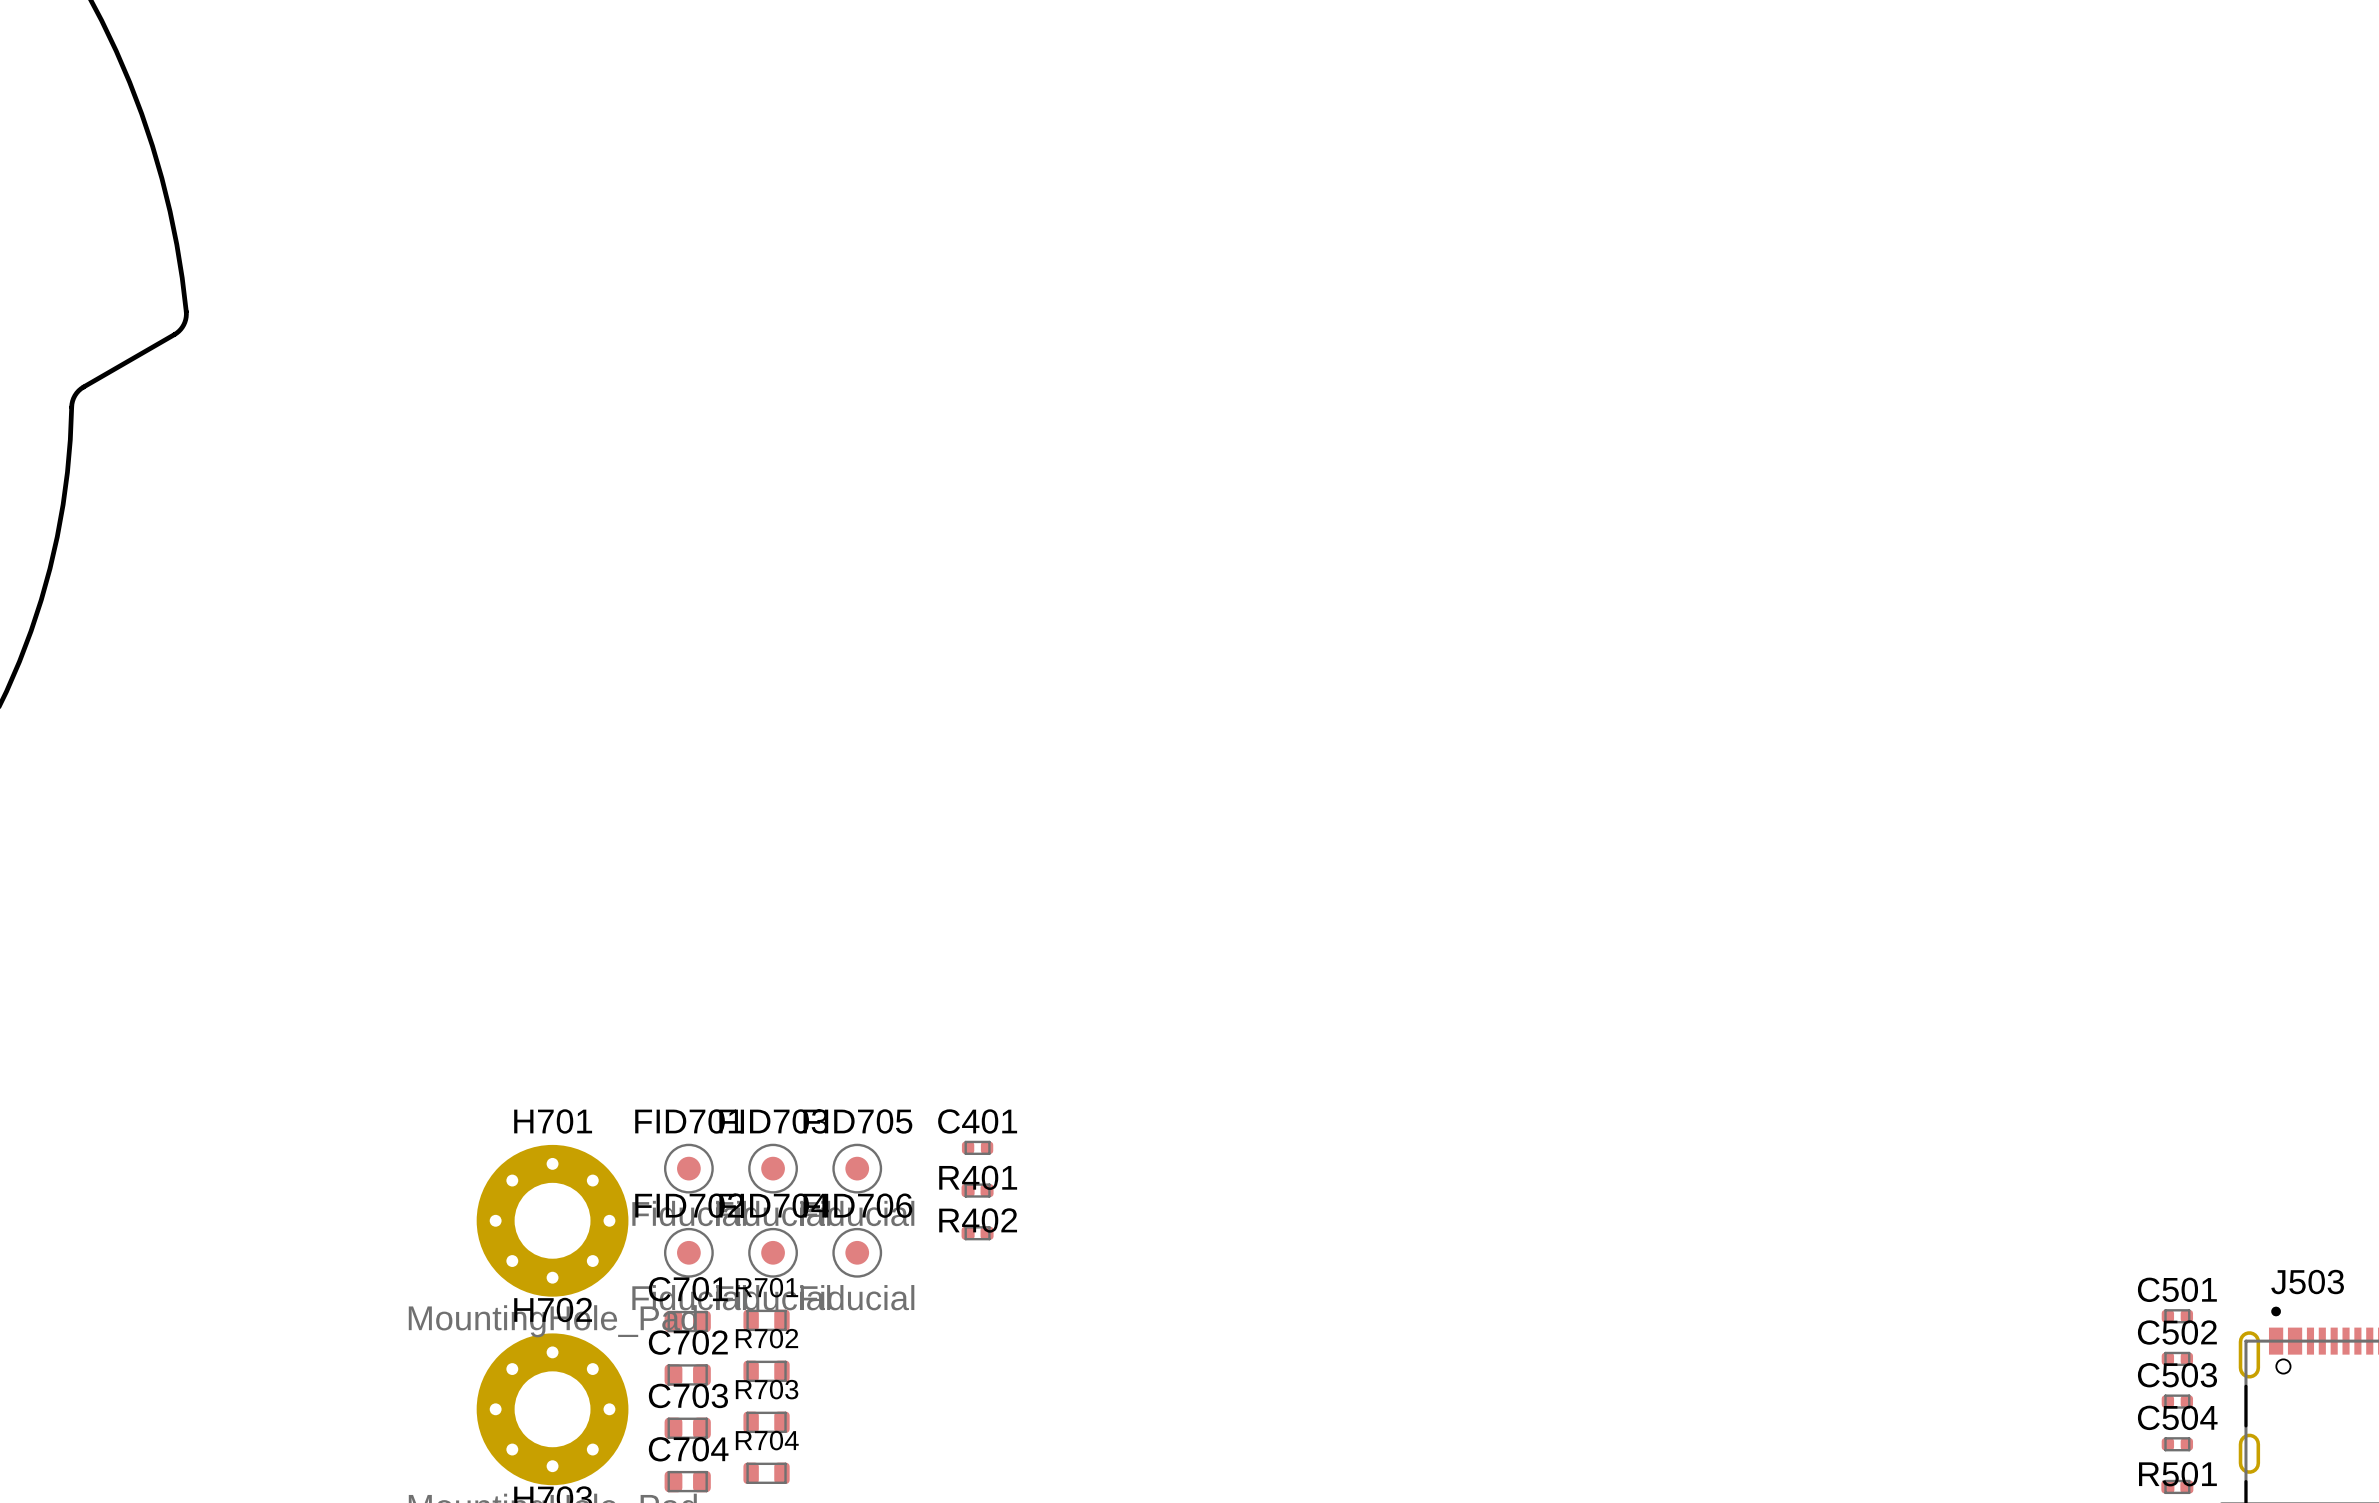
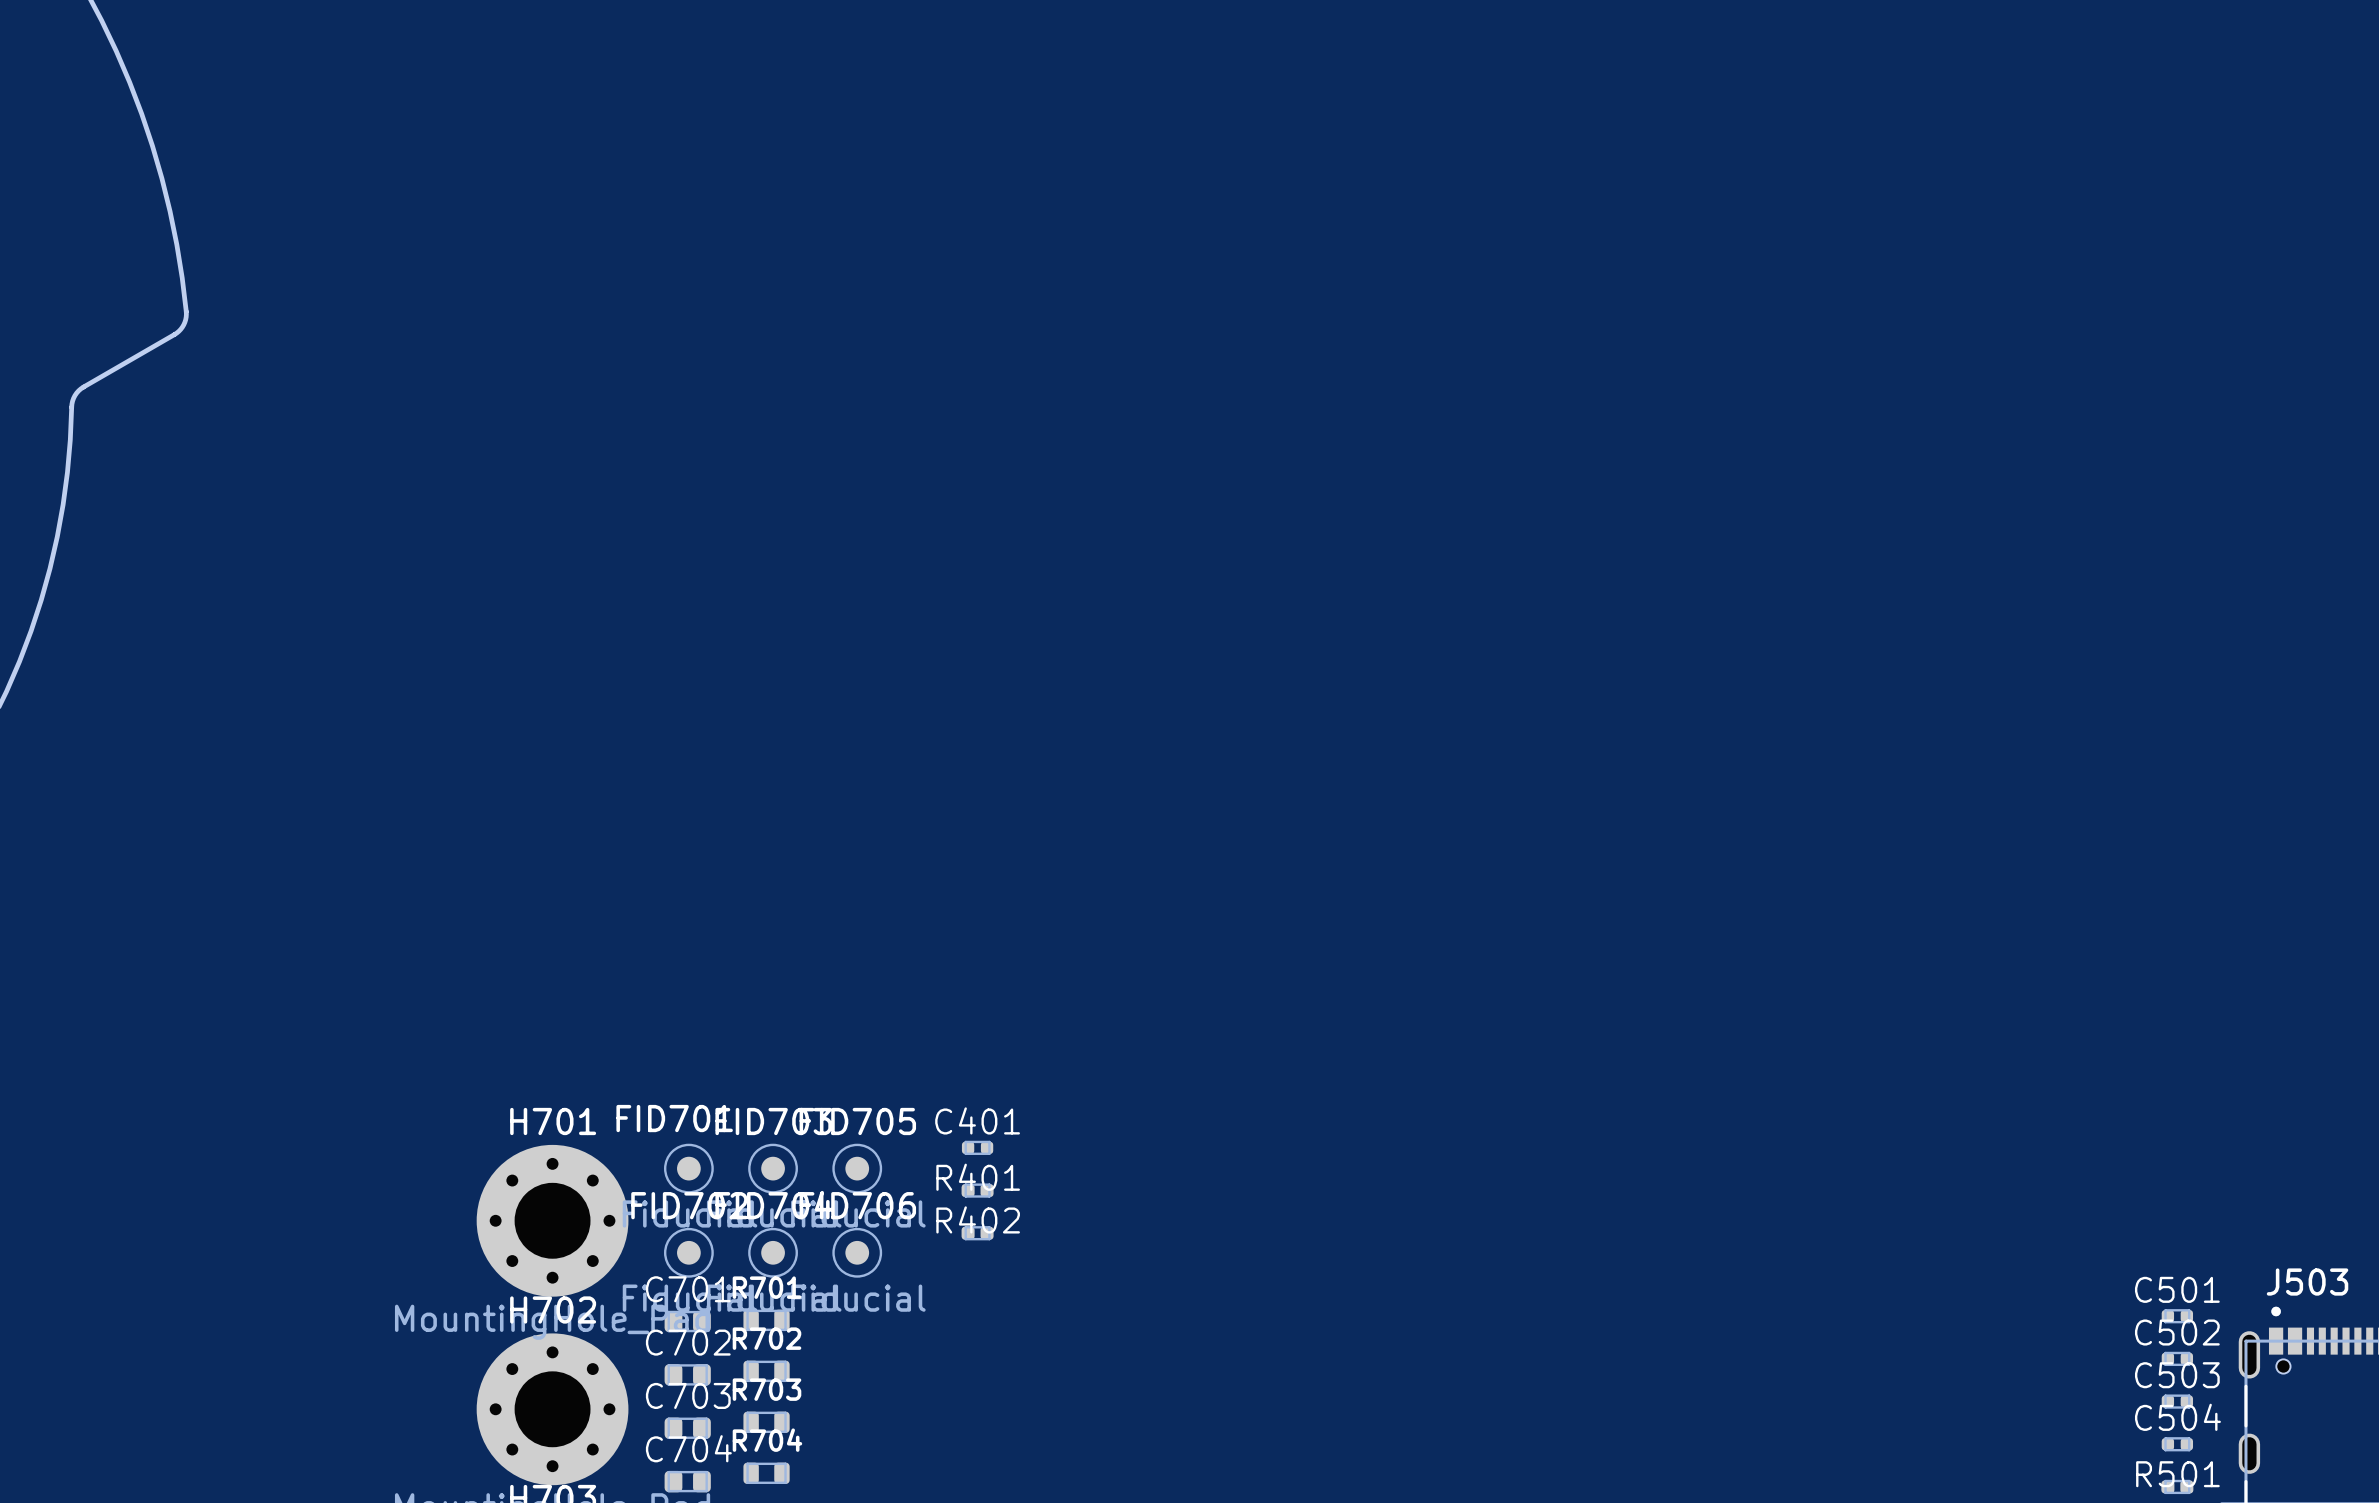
FID701 name position: FID701 (689, 1121) -> FID701 (674, 1118)

